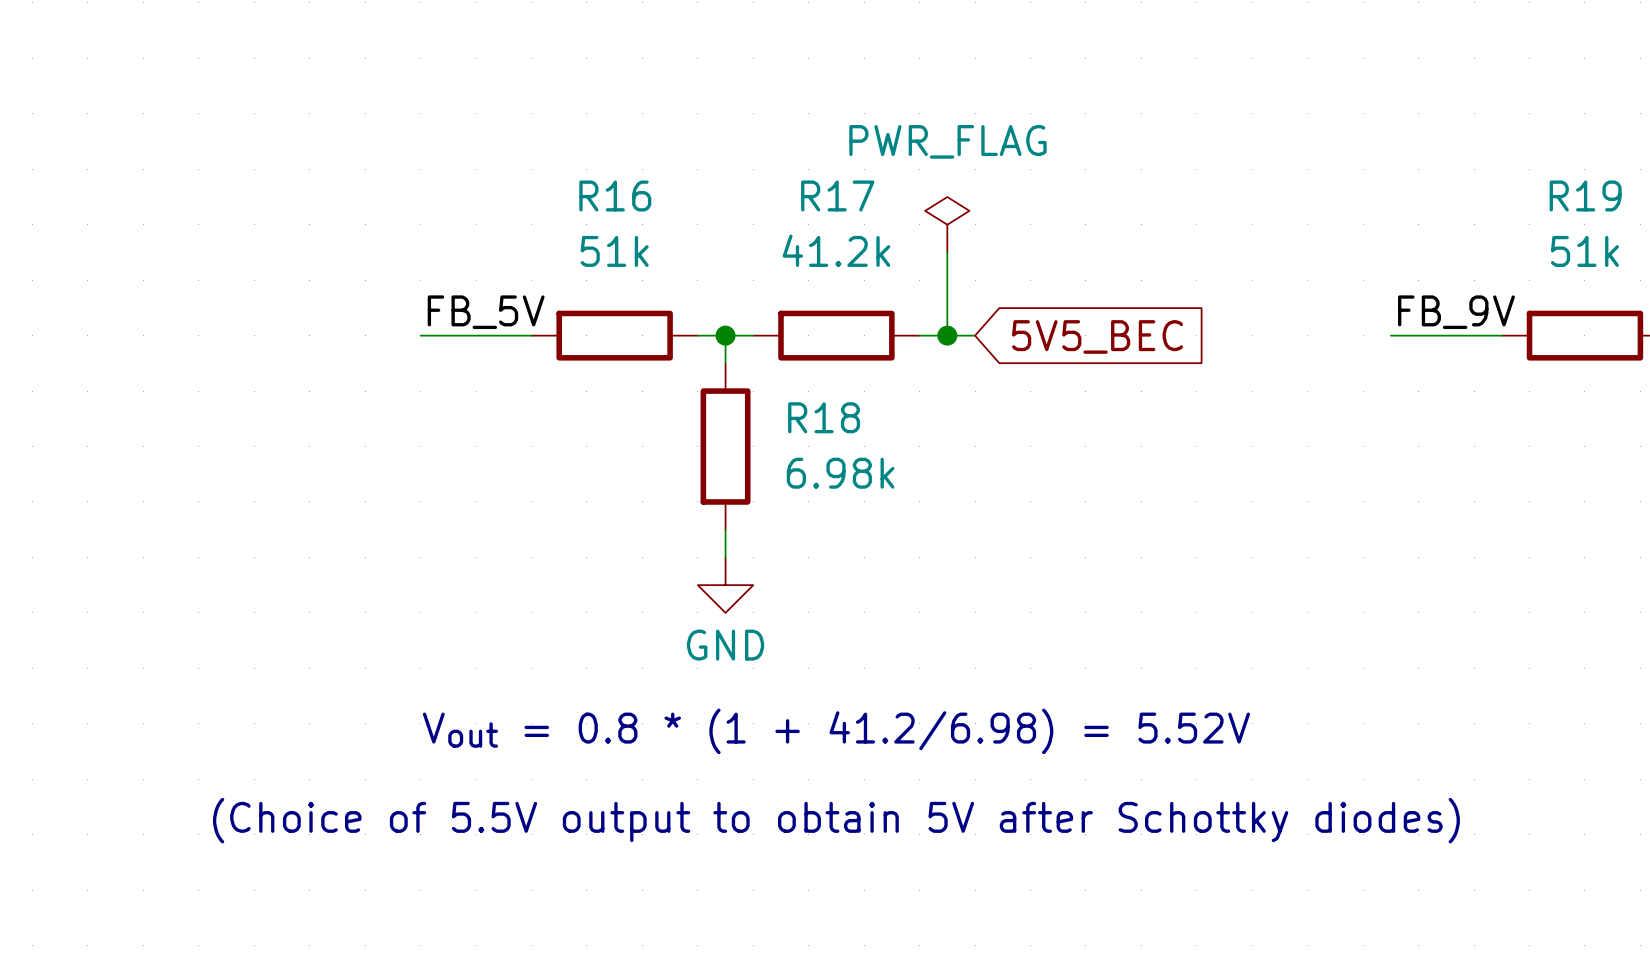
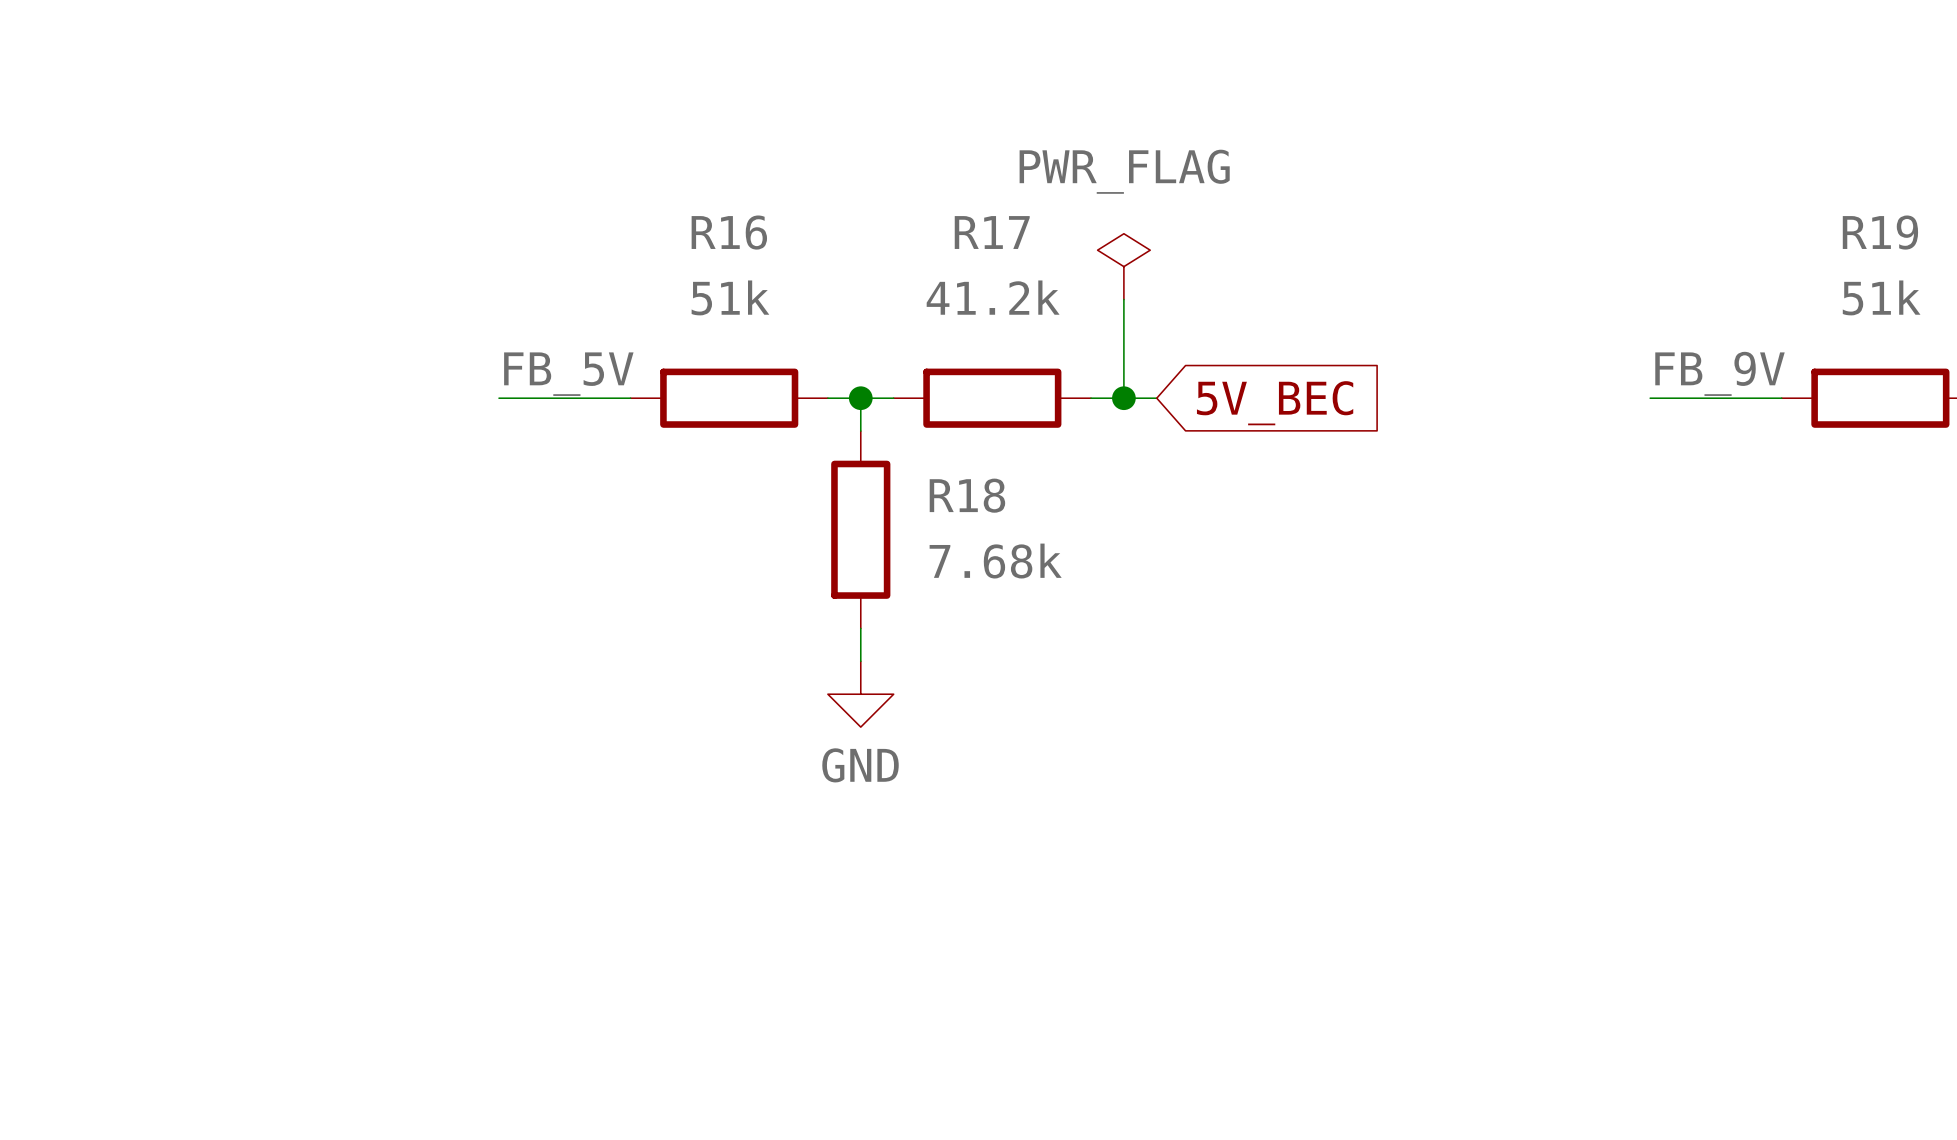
global label: 5V5_BEC (1097, 336) -> 5V_BEC (1275, 403)
R18 value: 6.98k (840, 473) -> 7.68k (995, 561)
text: Vout = 0.8 * (1 + 41.2/6.98) = 5.52V (836, 731) -> none
text: (Choice of 5.5V output to obtain 5V after Schottky diodes) (836, 820) -> none

